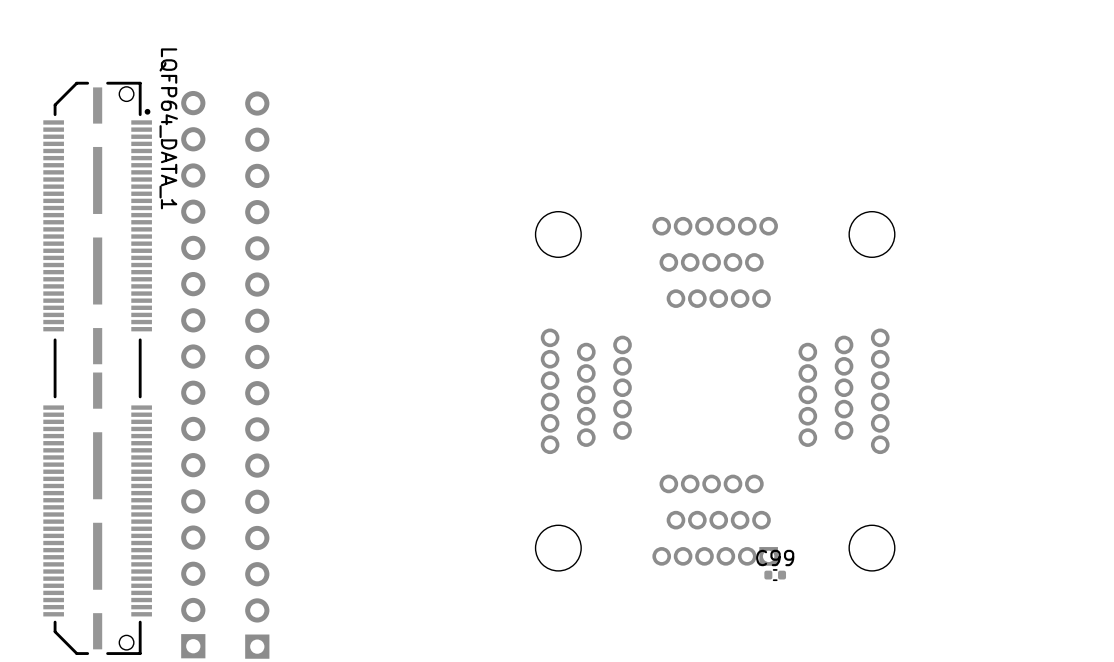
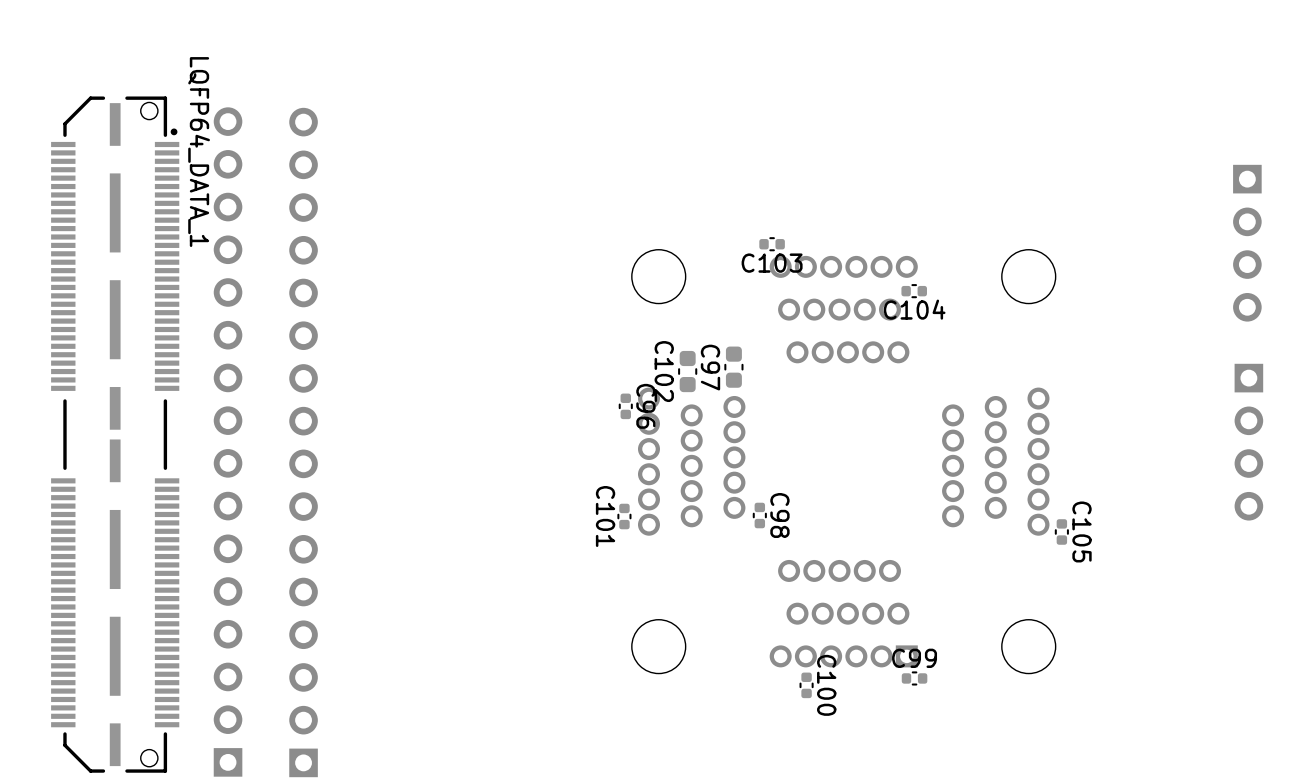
part: none -> (1247, 243)
C103: none -> (772, 244)
C104: none -> (914, 291)
C97: none -> (733, 367)
C102: none -> (687, 371)
C96: none -> (625, 406)
part: none -> (1248, 442)
C98: none -> (759, 515)
C101: none -> (624, 516)
C105: none -> (1061, 531)
C100: none -> (806, 685)

